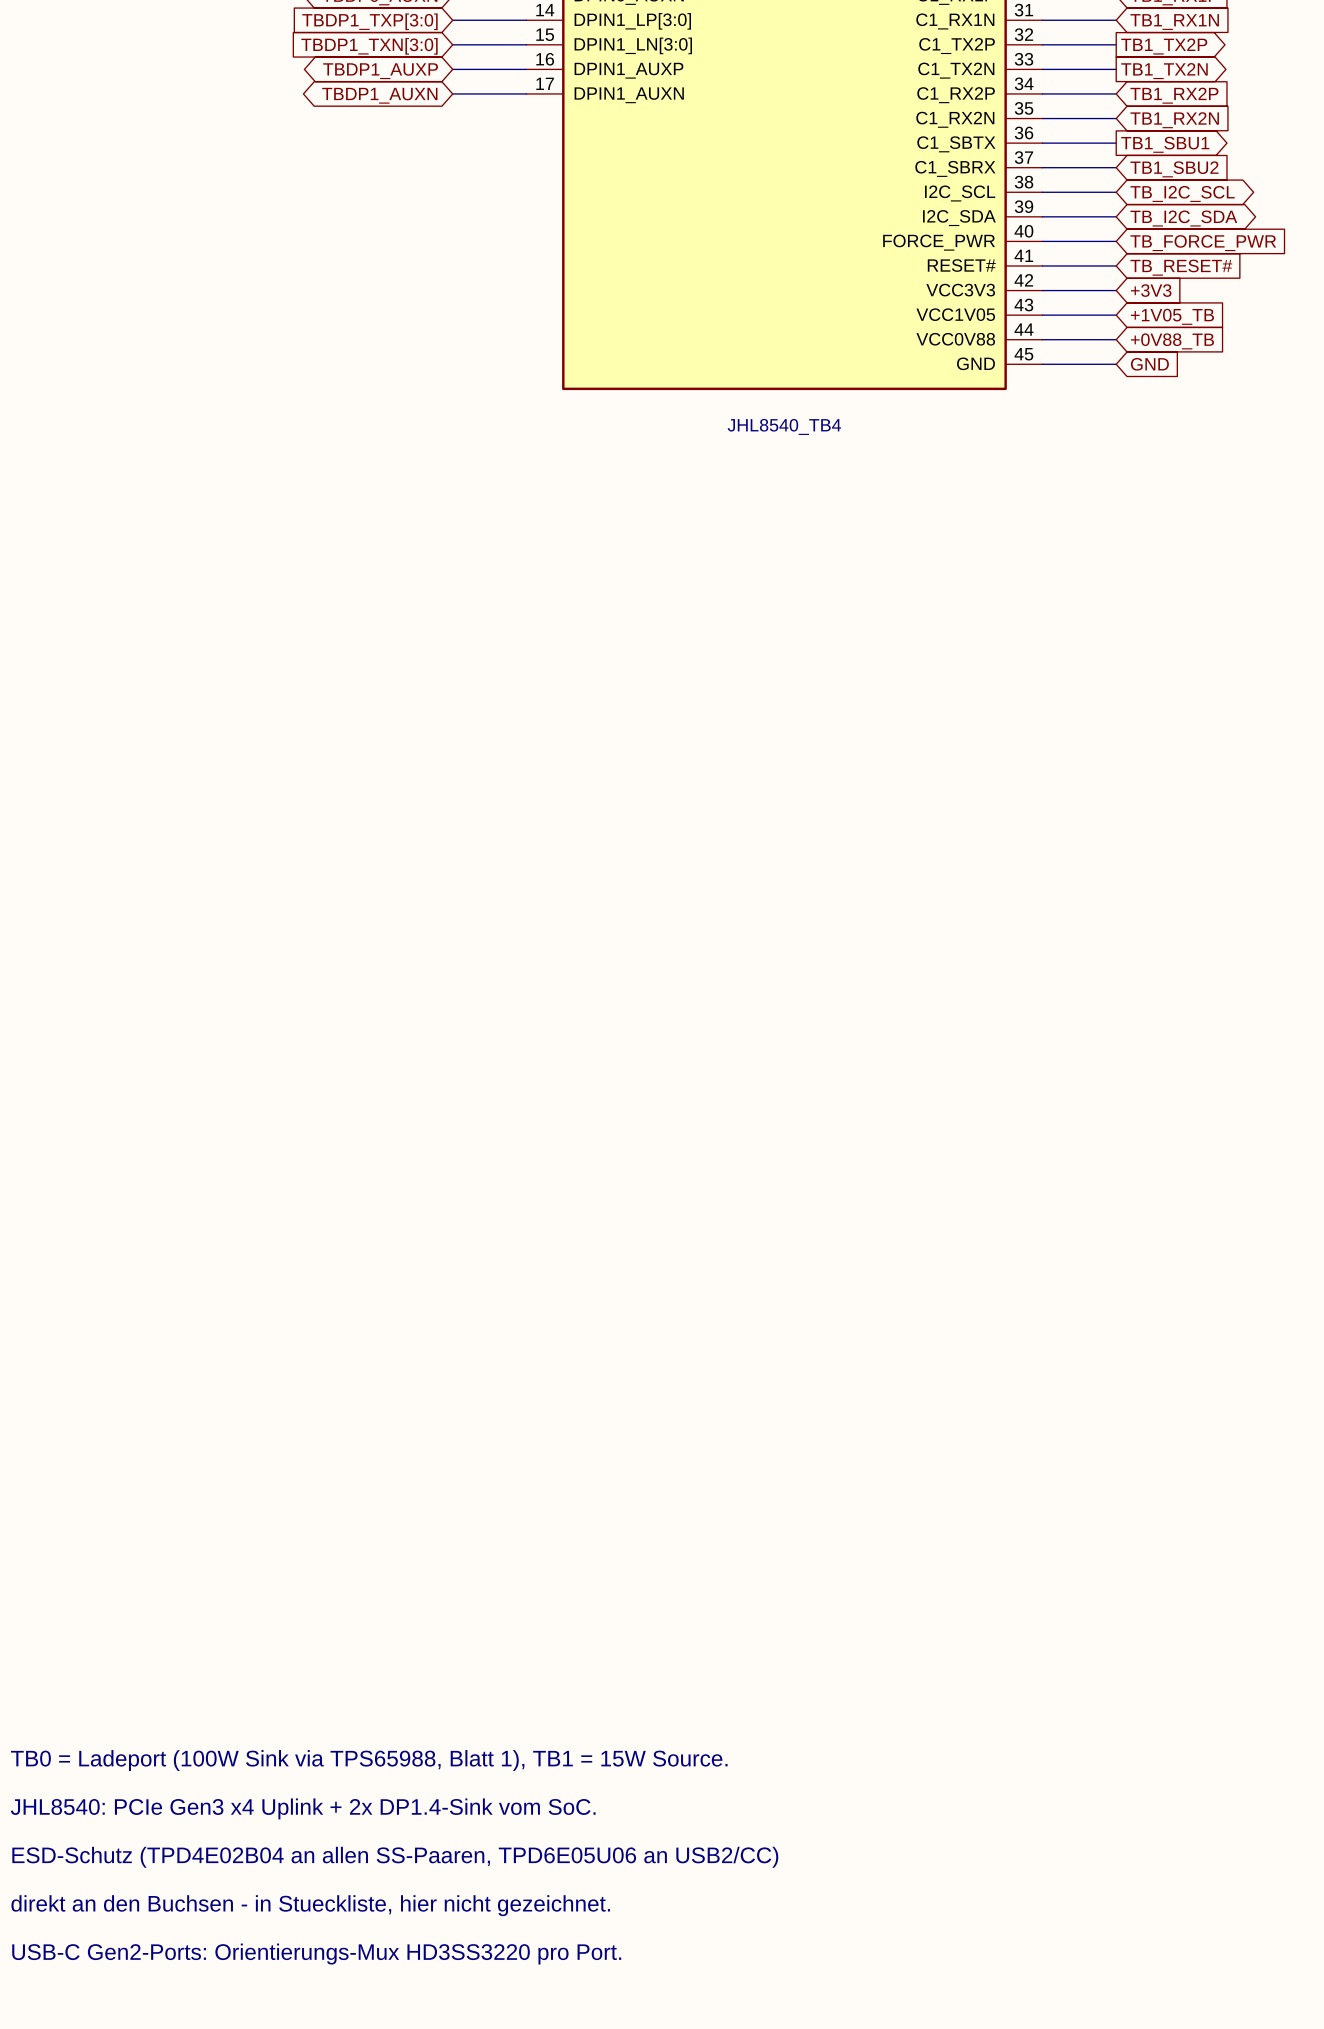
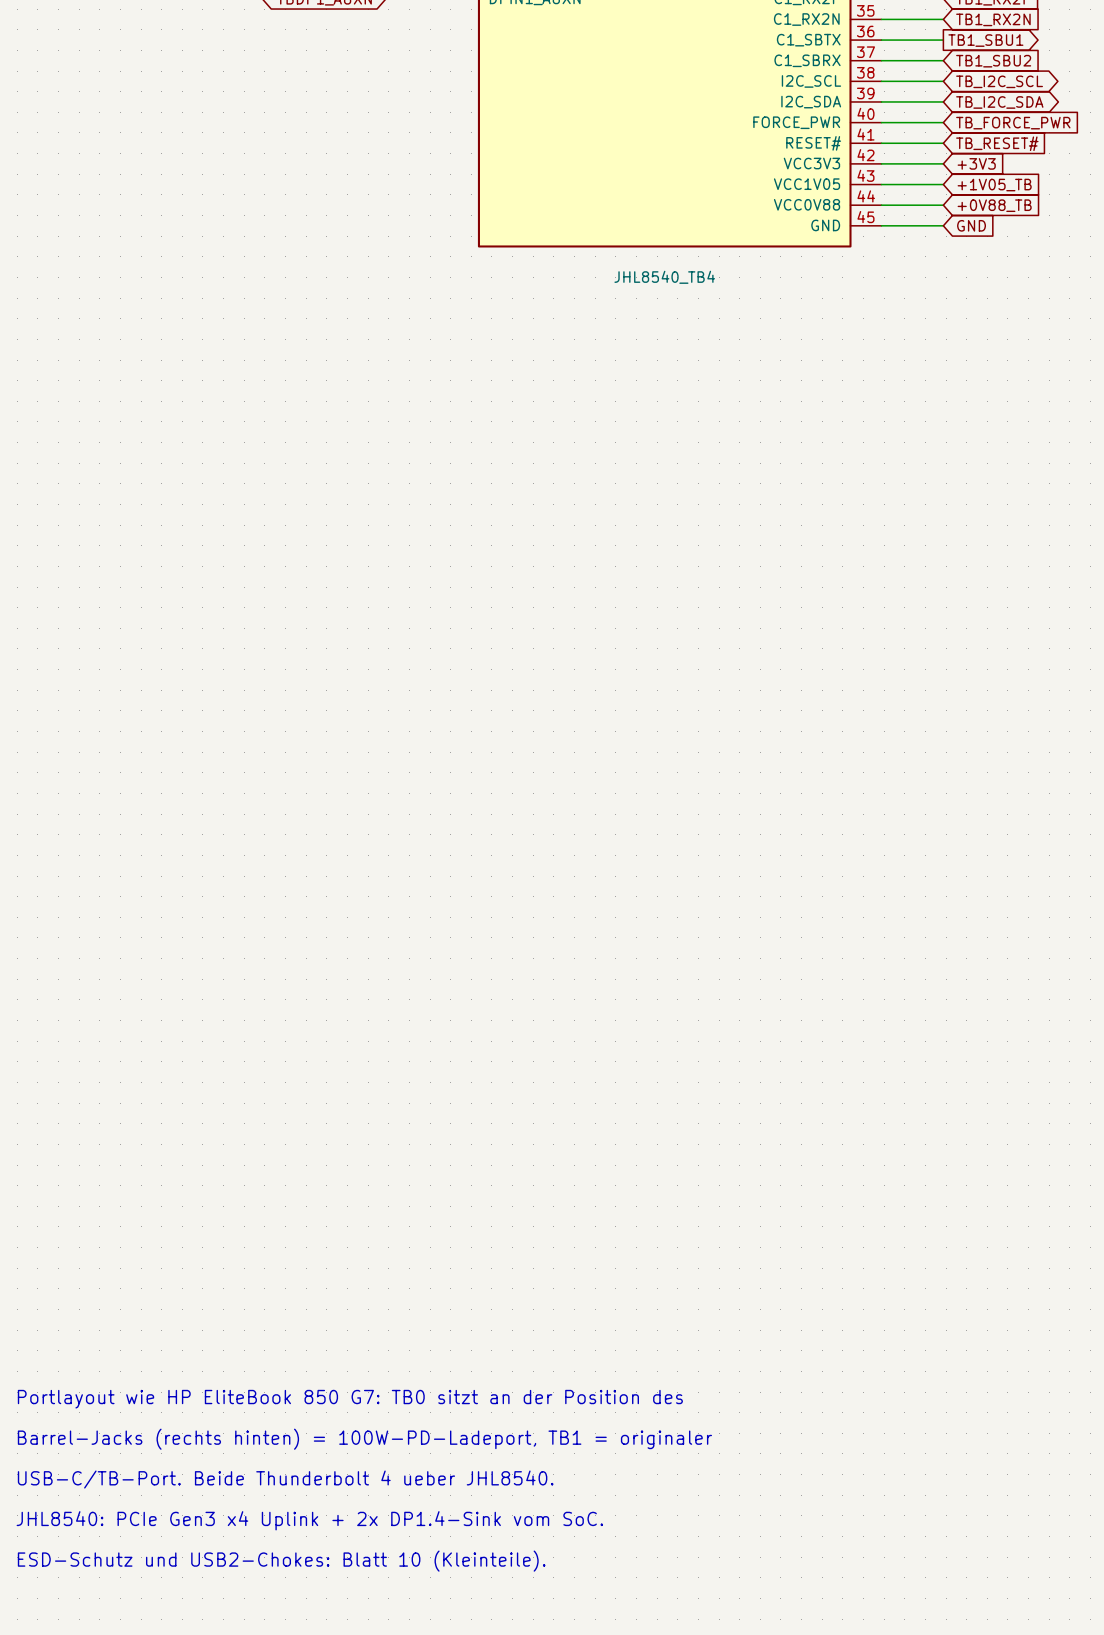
text: TB0 = Ladeport (100W Sink via TPS65988, Blatt 1), TB1 = 15W Source. (369, 1760) -> Portlayout wie HP EliteBook 850 G7: TB0 sitzt an der Position des (350, 1399)
text: JHL8540: PCIe Gen3 x4 Uplink + 2x DP1.4-Sink vom SoC. (303, 1808) -> Barrel-Jacks (rechts hinten) = 100W-PD-Ladeport, TB1 = originaler (364, 1439)
text: ESD-Schutz (TPD4E02B04 an allen SS-Paaren, TPD6E05U06 an USB2/CC) (395, 1857) -> USB-C/TB-Port. Beide Thunderbolt 4 ueber JHL8540. (285, 1479)
text: direkt an den Buchsen - in Stueckliste, hier nicht gezeichnet. (310, 1905) -> JHL8540: PCIe Gen3 x4 Uplink + 2x DP1.4-Sink vom SoC. (309, 1520)
text: USB-C Gen2-Ports: Orientierungs-Mux HD3SS3220 pro Port. (316, 1954) -> ESD-Schutz und USB2-Chokes: Blatt 10 (Kleinteile). (281, 1561)

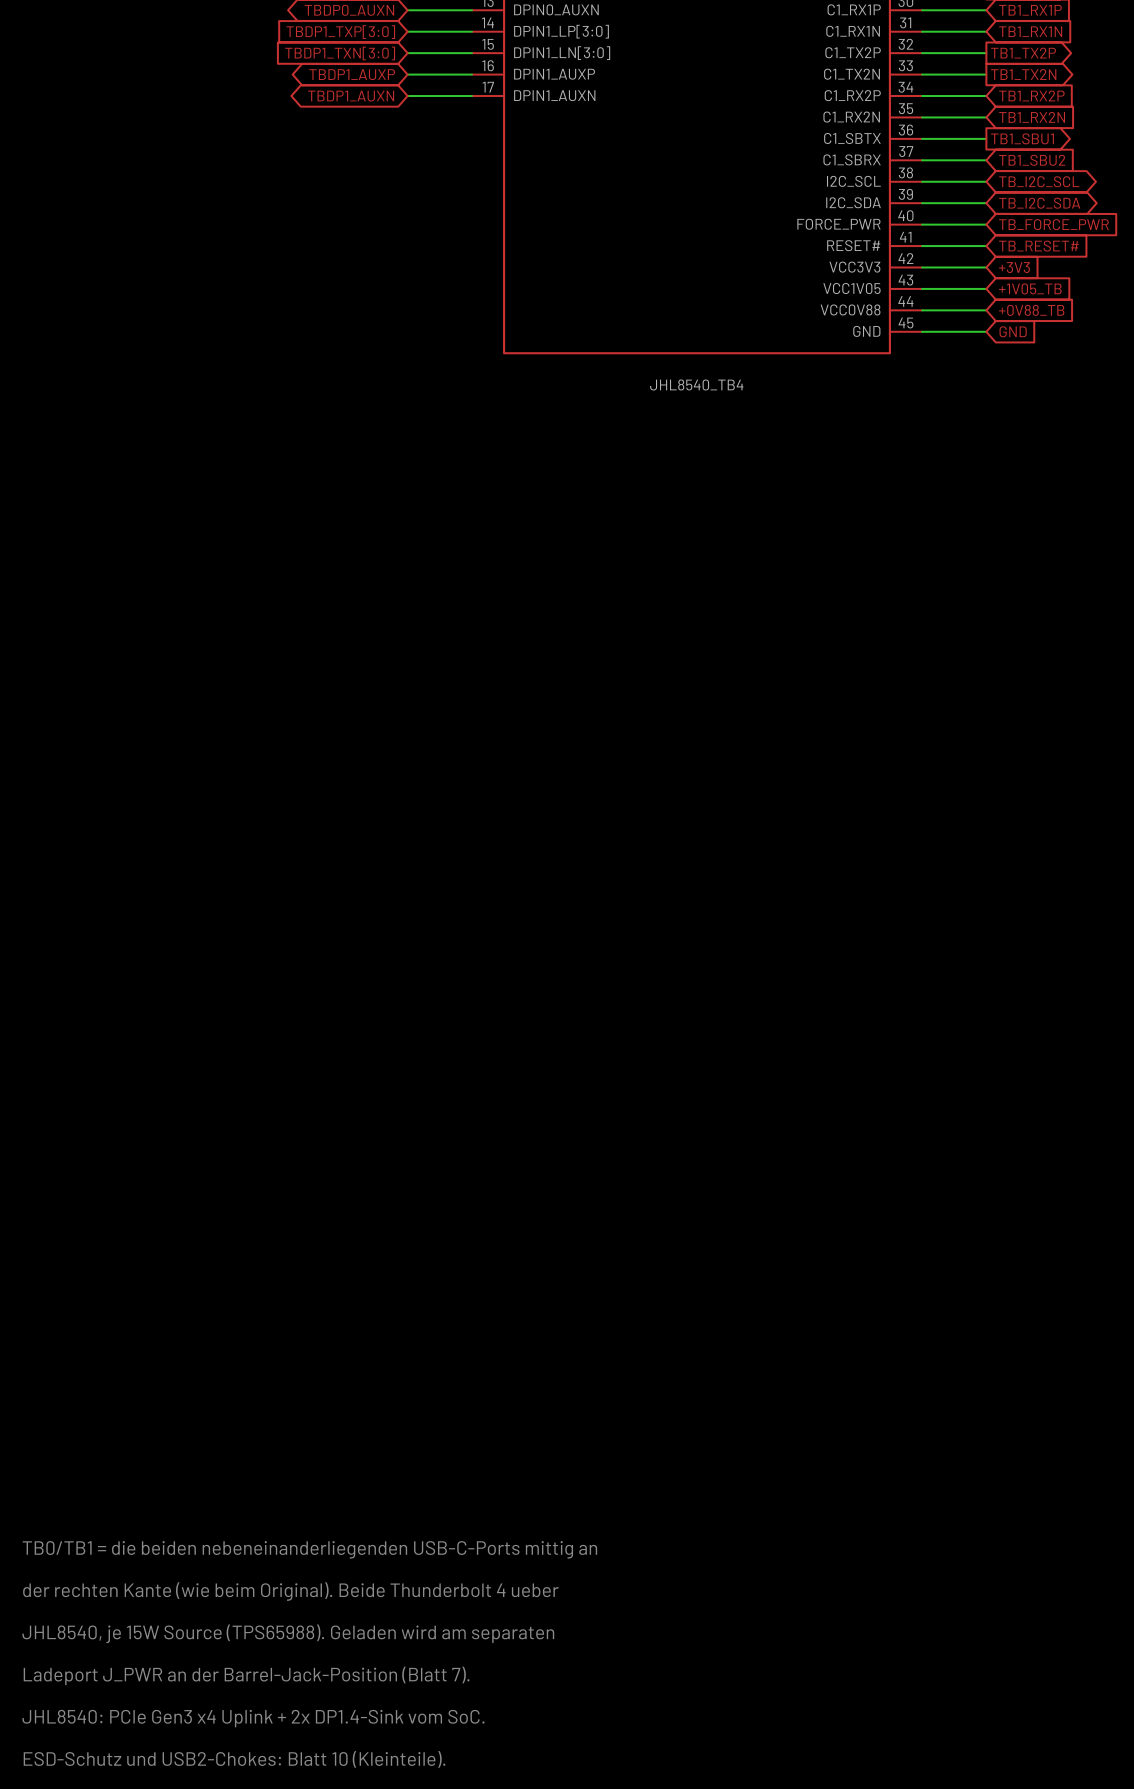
text: Portlayout wie HP EliteBook 850 G7: TB0 sitzt an der Position des (350, 1399) -> TB0/TB1 = die beiden nebeneinanderliegenden USB-C-Ports mittig an (309, 1549)
text: Barrel-Jacks (rechts hinten) = 100W-PD-Ladeport, TB1 = originaler (364, 1439) -> der rechten Kante (wie beim Original). Beide Thunderbolt 4 ueber (290, 1591)
text: USB-C/TB-Port. Beide Thunderbolt 4 ueber JHL8540. (285, 1479) -> JHL8540, je 15W Source (TPS65988). Geladen wird am separaten (288, 1633)
text: JHL8540: PCIe Gen3 x4 Uplink + 2x DP1.4-Sink vom SoC. (309, 1520) -> Ladeport J_PWR an der Barrel-Jack-Position (Blatt 7). (246, 1675)
text: ESD-Schutz und USB2-Chokes: Blatt 10 (Kleinteile). (281, 1561) -> JHL8540: PCIe Gen3 x4 Uplink + 2x DP1.4-Sink vom SoC. (253, 1718)
text: none -> ESD-Schutz und USB2-Chokes: Blatt 10 (Kleinteile). (234, 1759)

